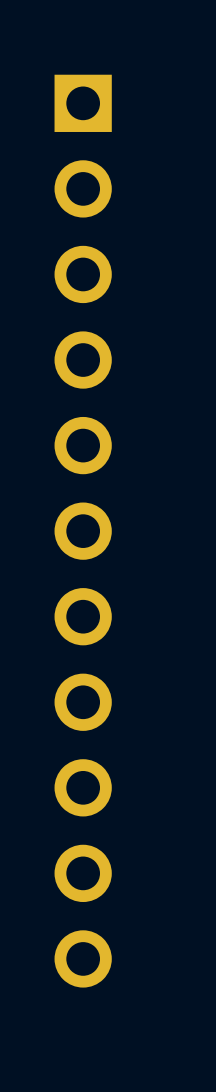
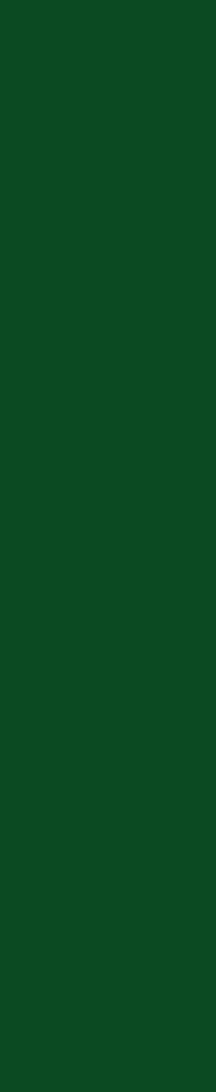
part: (83, 531) -> none

